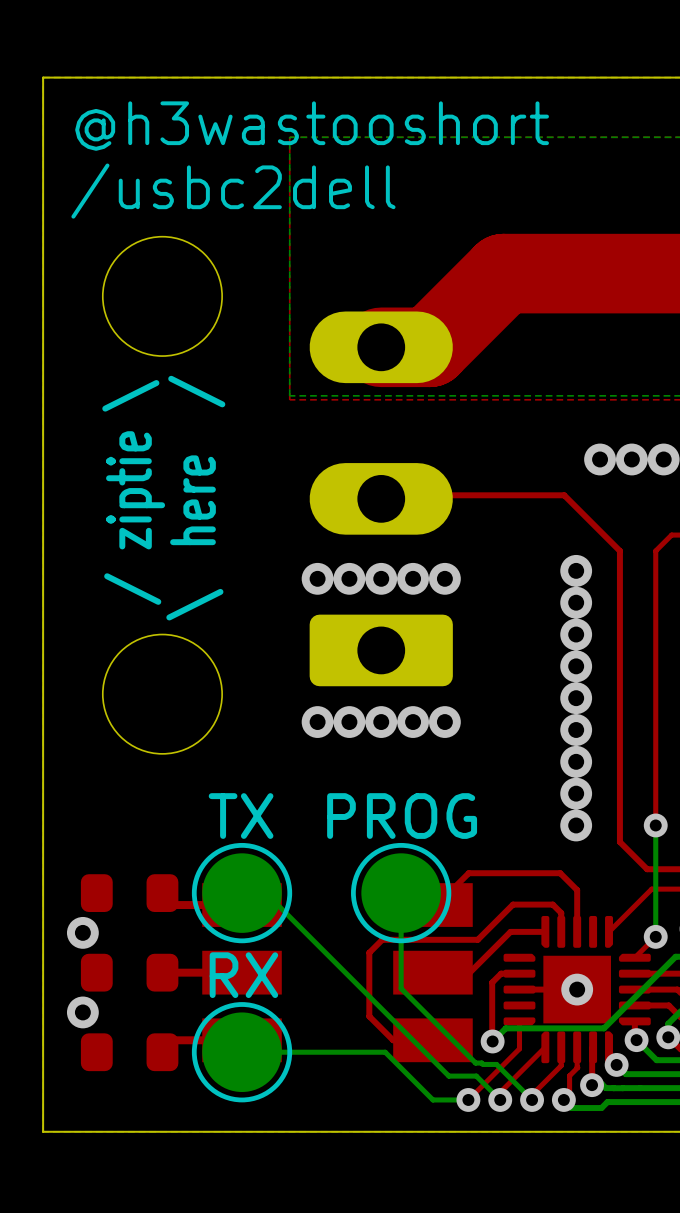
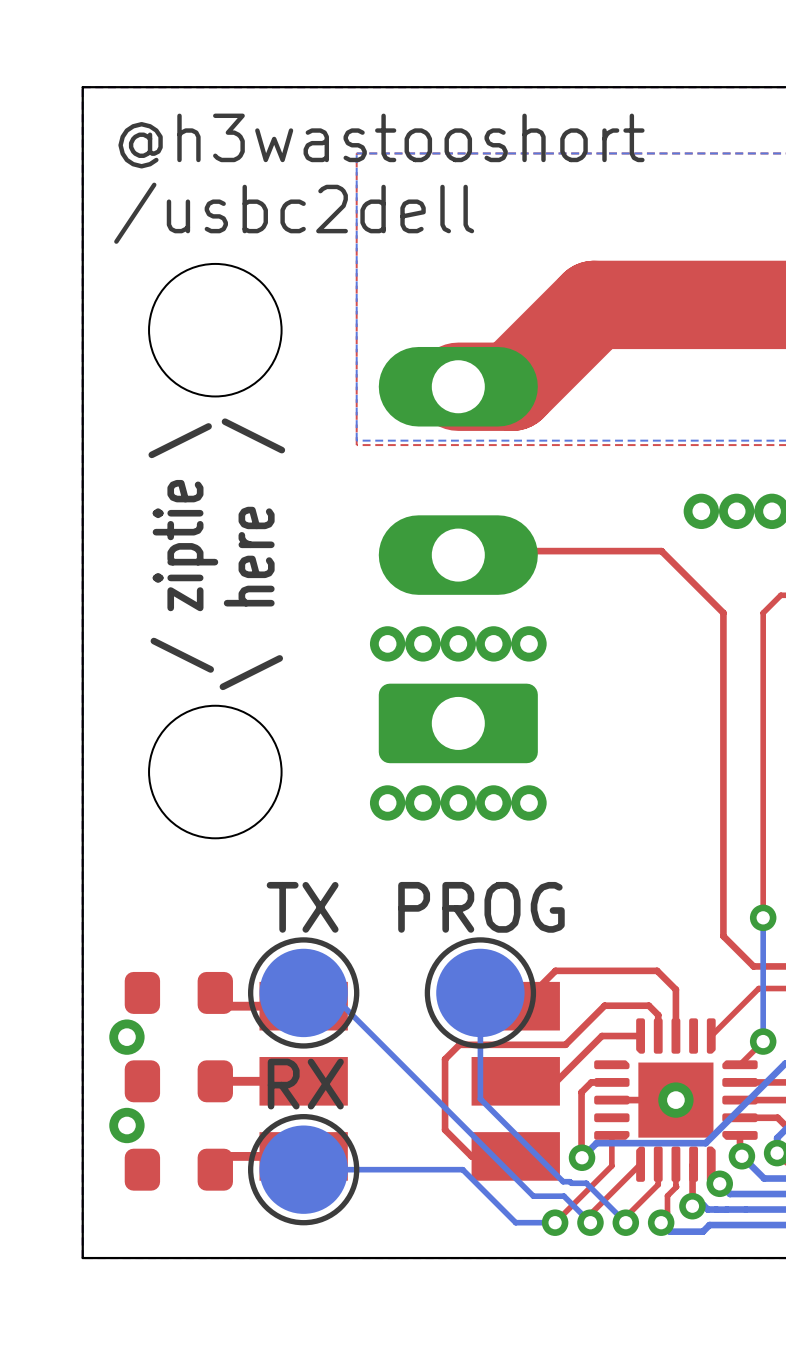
via: (576, 570) -> none
via: (576, 602) -> none
via: (576, 634) -> none
via: (576, 666) -> none
via: (576, 698) -> none
via: (576, 730) -> none
via: (576, 761) -> none
via: (576, 793) -> none
via: (576, 825) -> none

